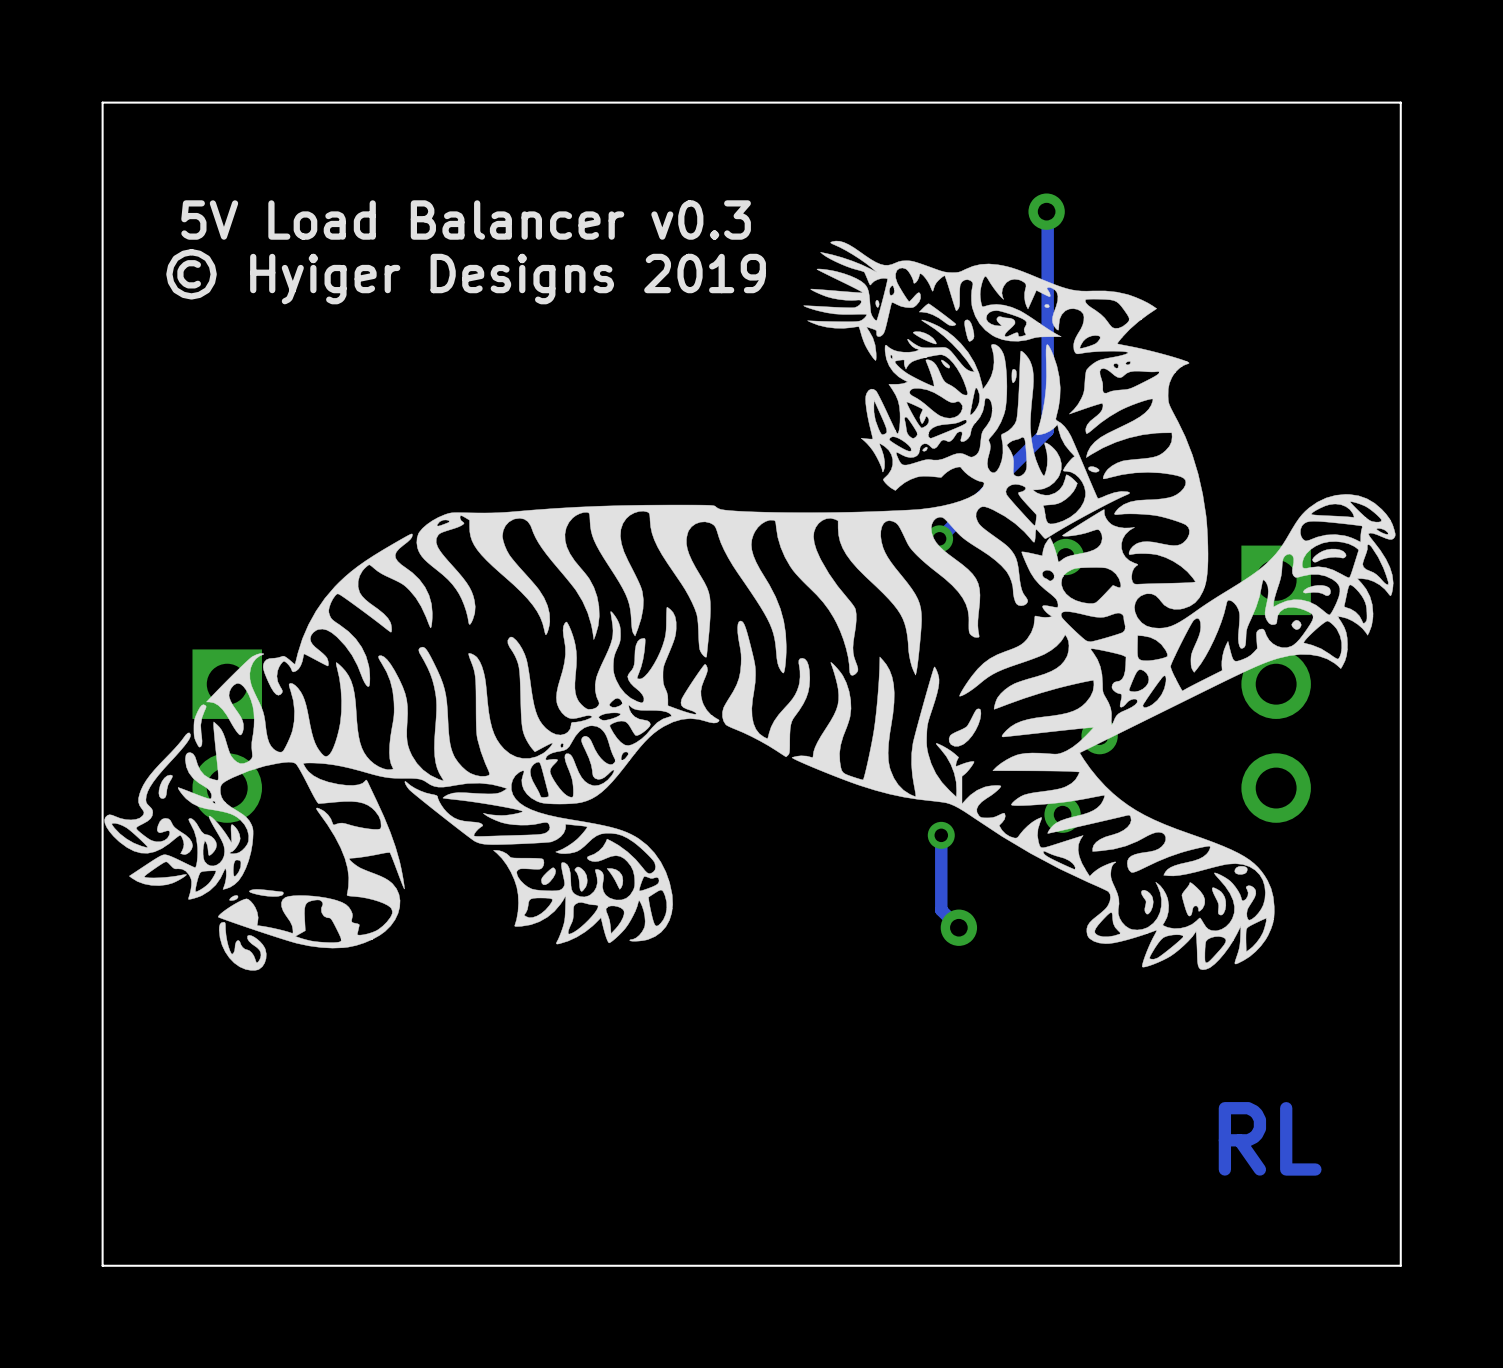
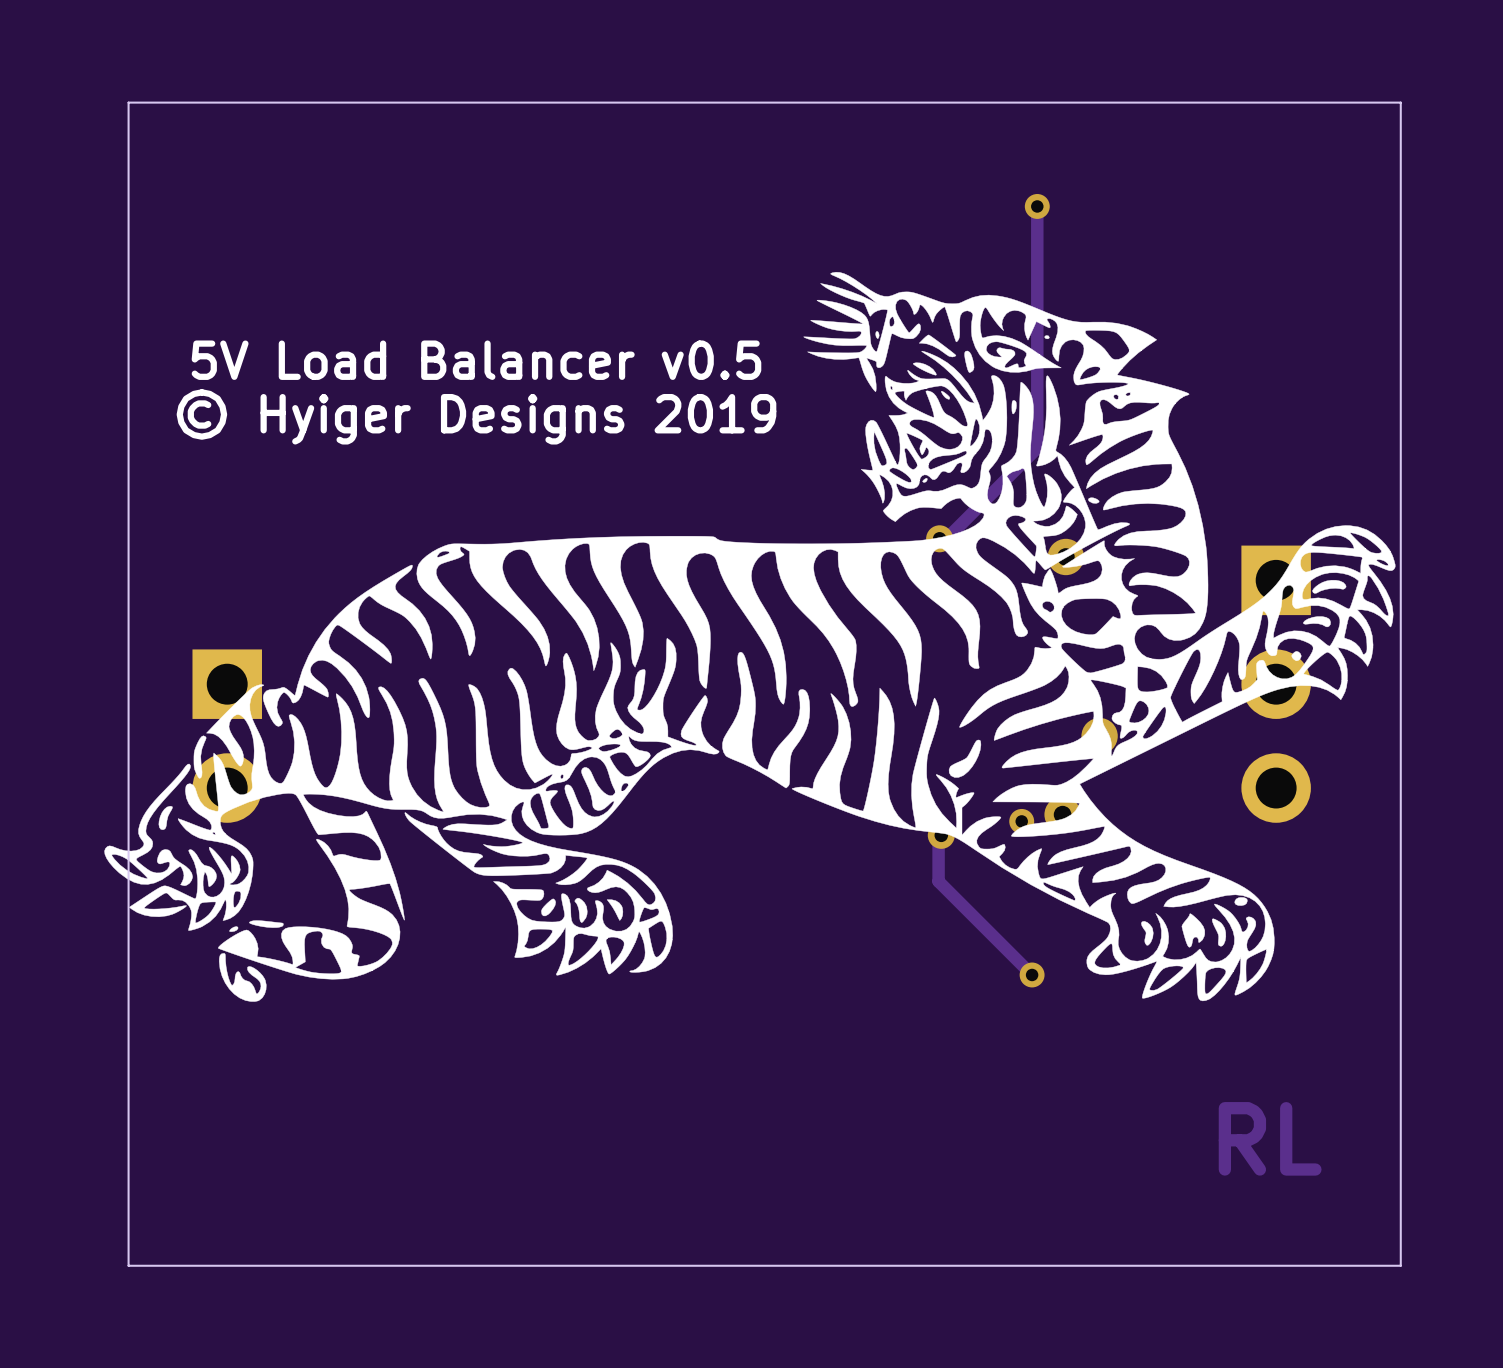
board edge: (128, 102) (102, 102) (102, 1265) (128, 1265) -> (128, 102) (128, 1265)
via size: [1028, 193, 1065, 230] -> [1024, 194, 1050, 219]
track: none -> (1037, 206) (1037, 448) (940, 544)
track: (1047, 211) (1047, 430) (939, 538) -> none
text: 5V Load Balancer v0.3 (466, 220) -> none
text position: © Hyiger Designs 2019 (466, 276) -> © Hyiger Designs 2019 (476, 416)
text: none -> 5V Load Balancer v0.5 (476, 360)
drawing position: (749, 605) -> (749, 636)
track: none -> (938, 821) (938, 881) (1032, 974)
via: none -> (1021, 821)
track: (941, 835) (941, 910) (959, 928) -> none
via: (958, 927) -> none
via: none -> (1032, 974)

